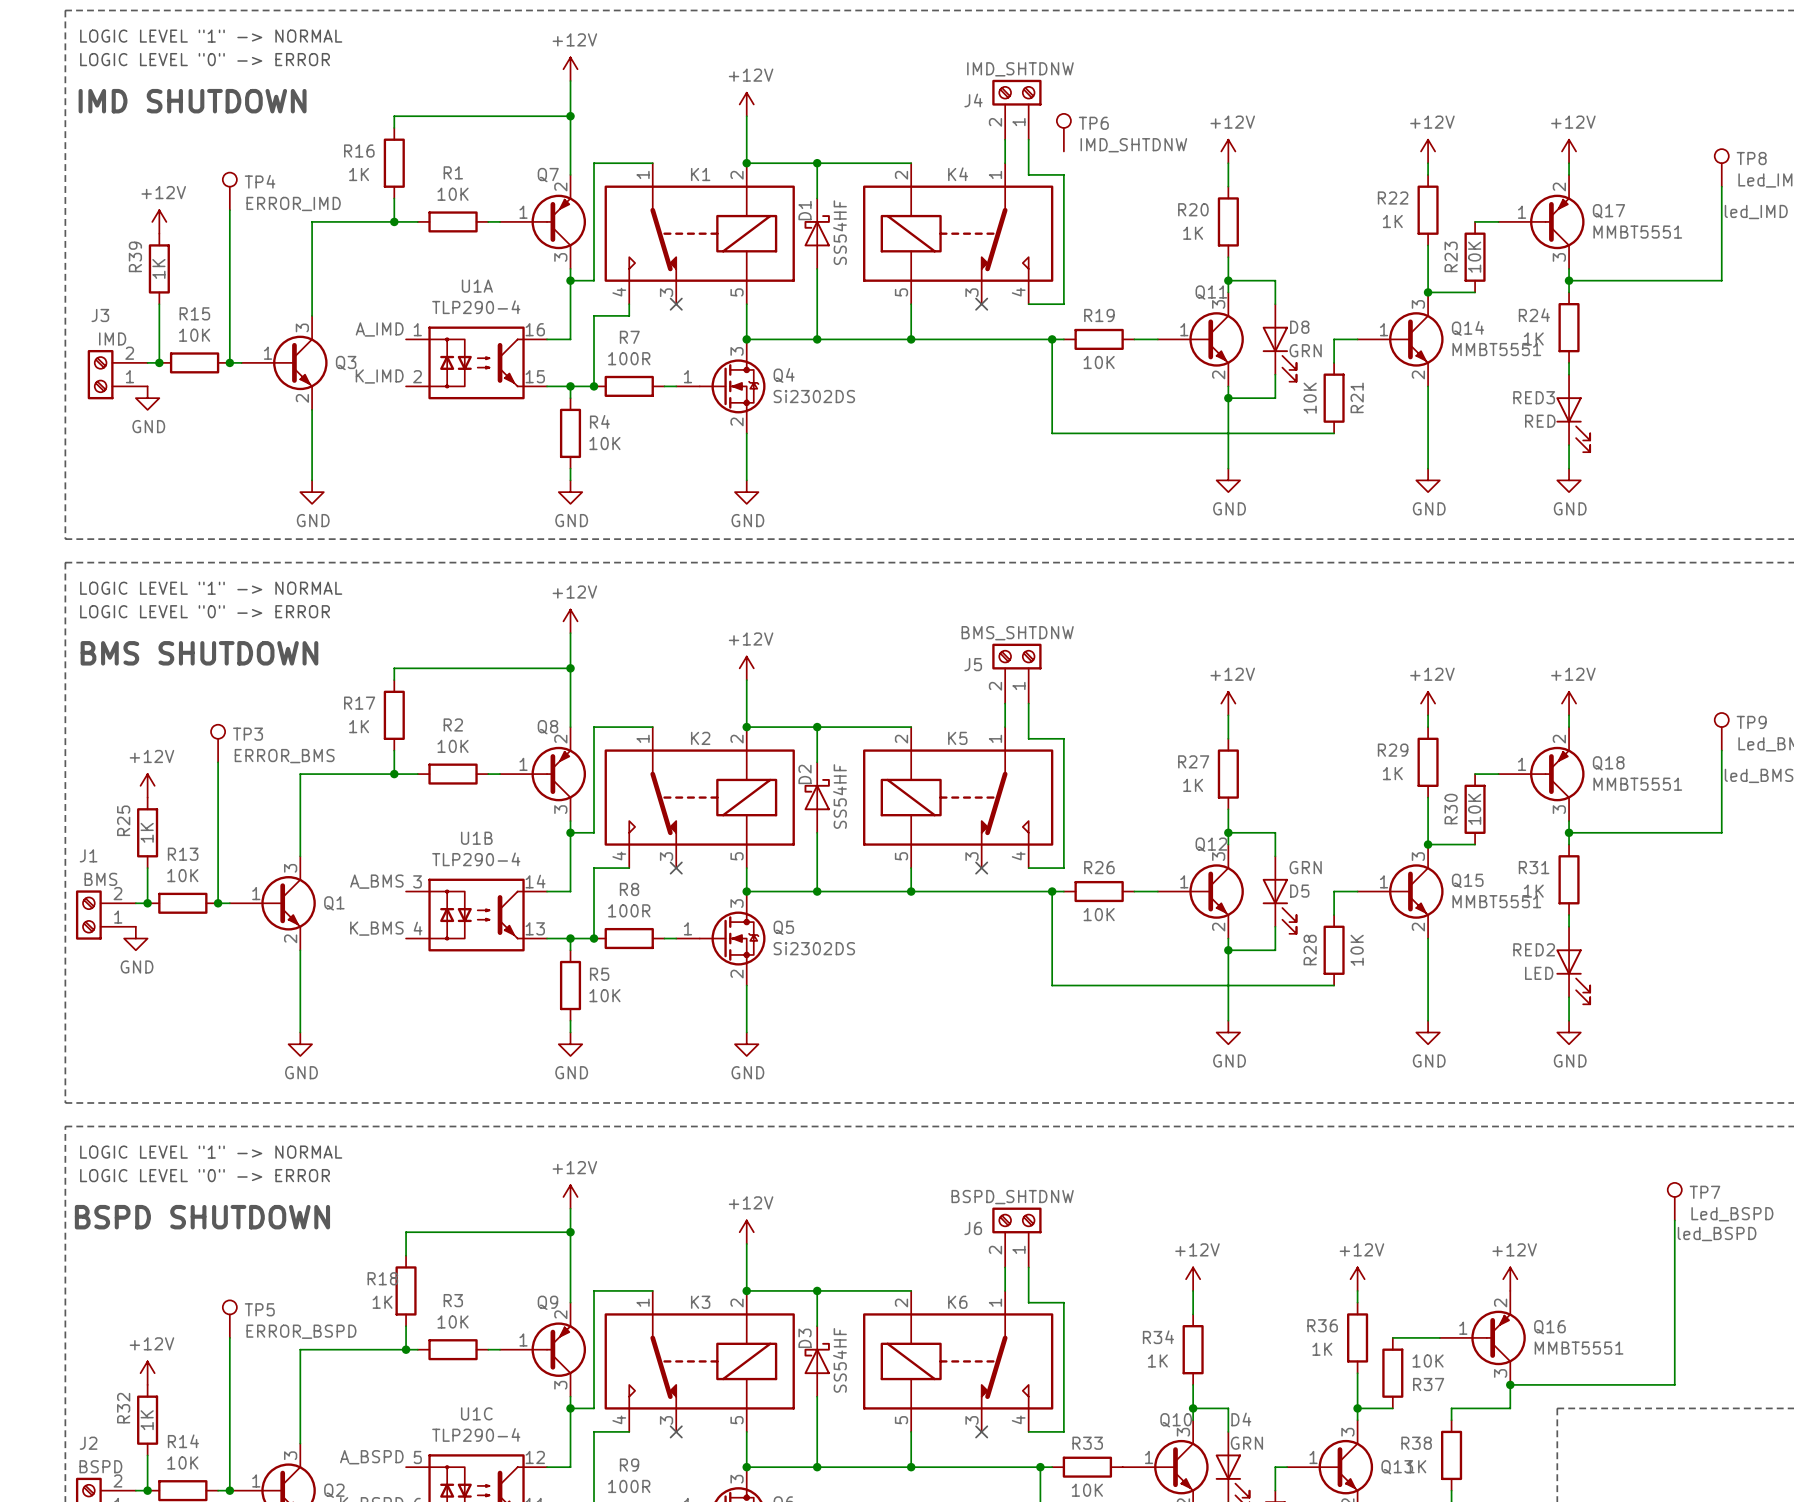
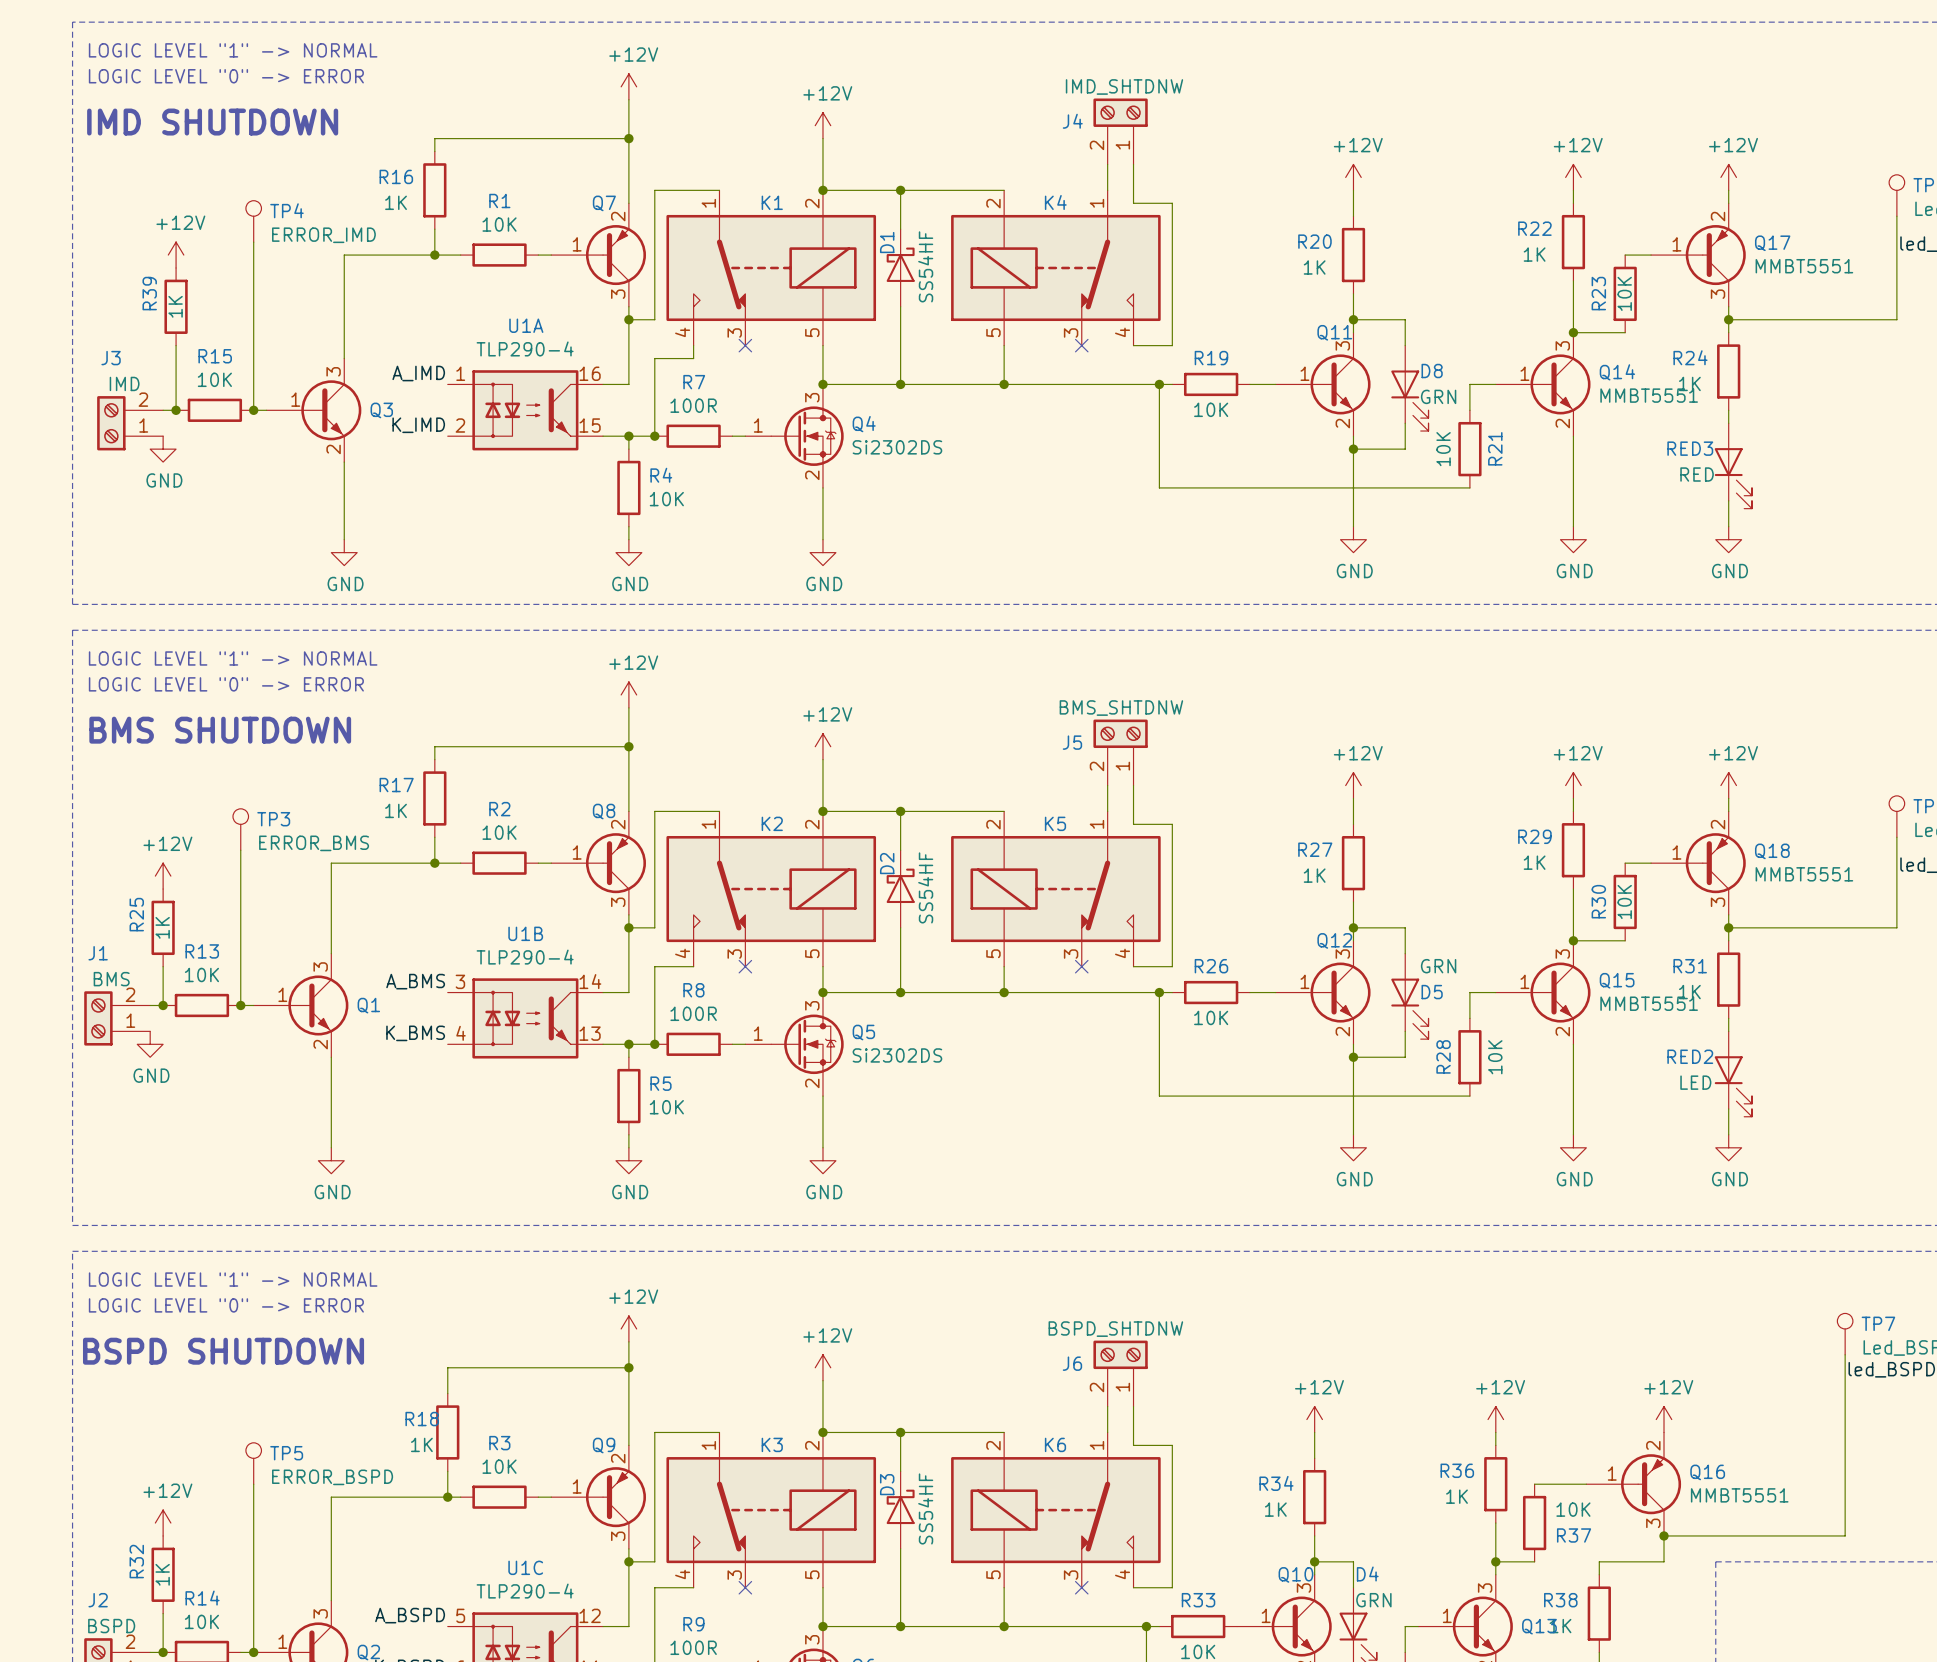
TP6: IMD_SHTDNW (1063, 132) -> none

